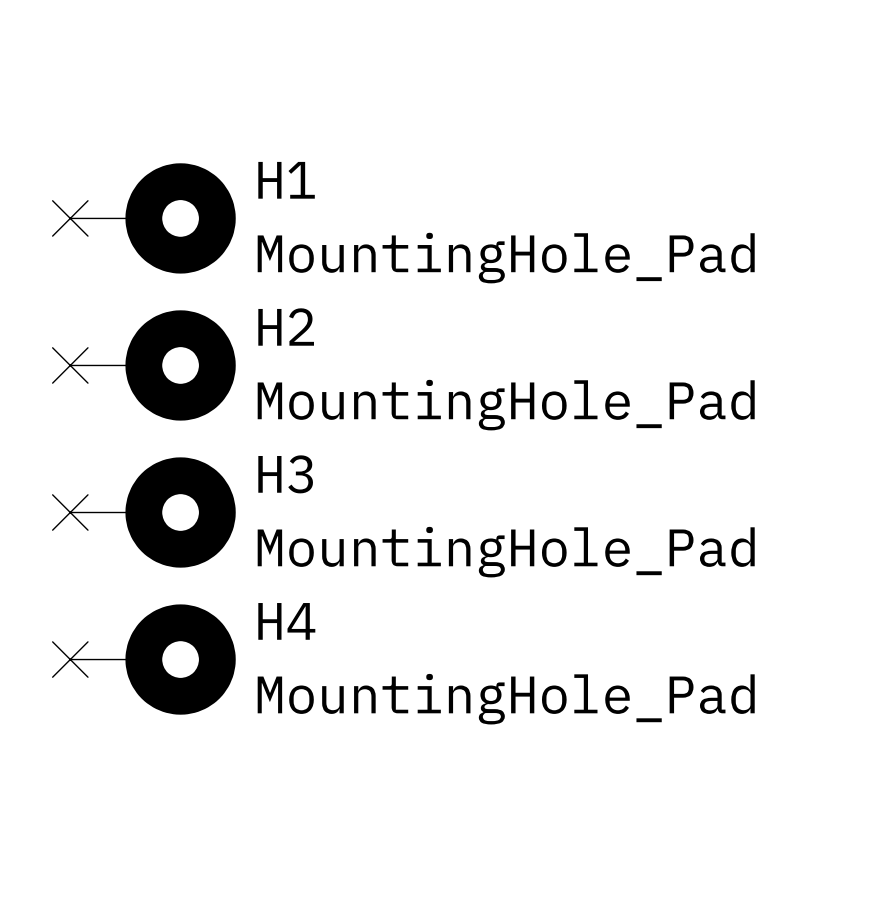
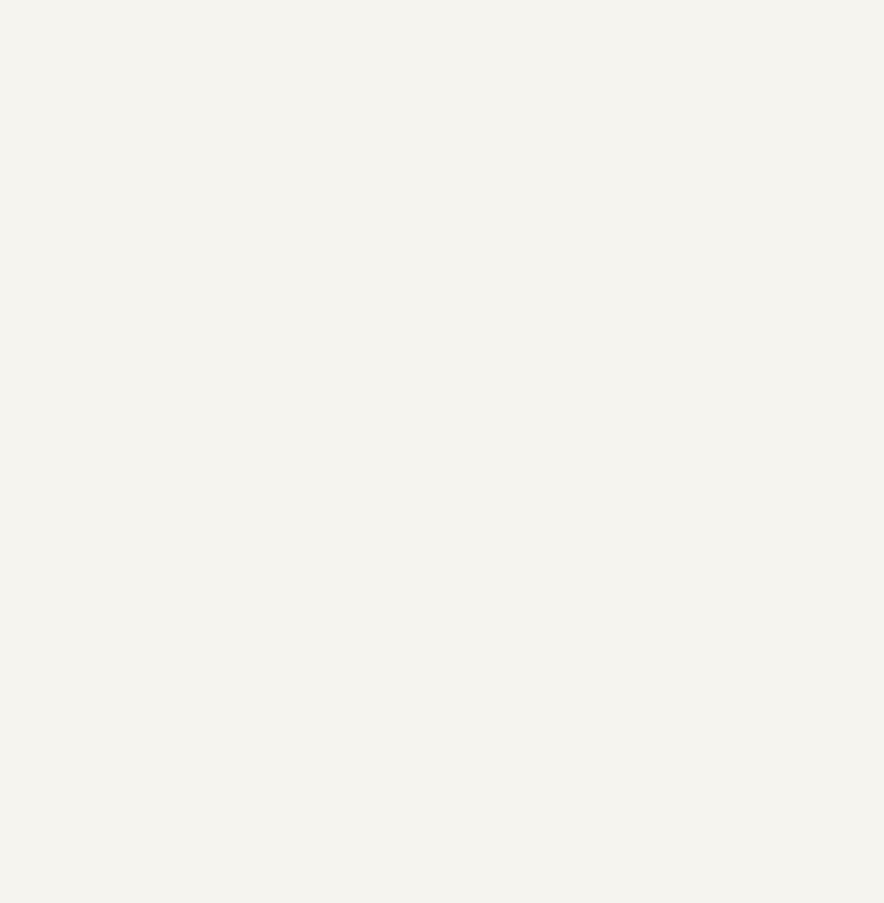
no-connect mark: (70, 218) -> none
H1: MountingHole_Pad (153, 218) -> none
no-connect mark: (70, 365) -> none
H2: MountingHole_Pad (153, 365) -> none
no-connect mark: (70, 512) -> none
H3: MountingHole_Pad (153, 512) -> none
no-connect mark: (70, 659) -> none
H4: MountingHole_Pad (153, 659) -> none

